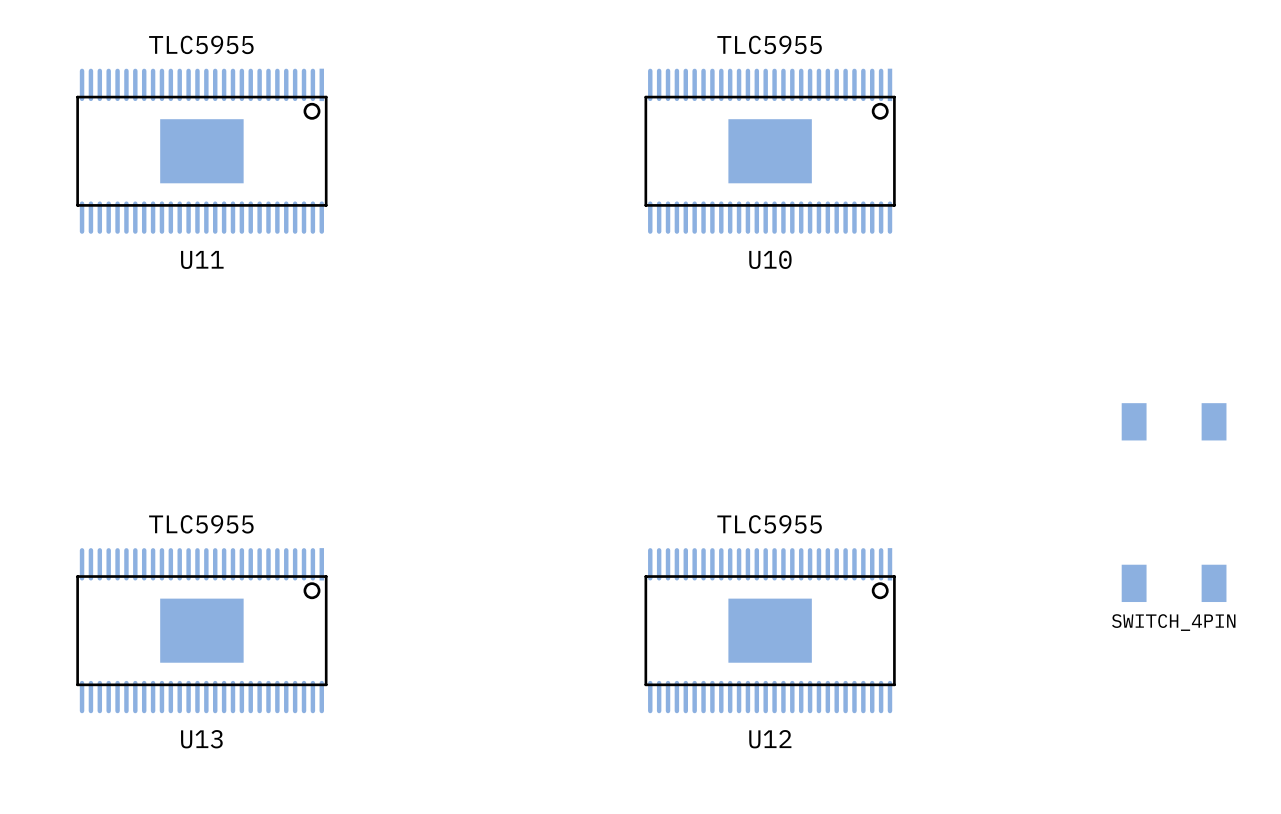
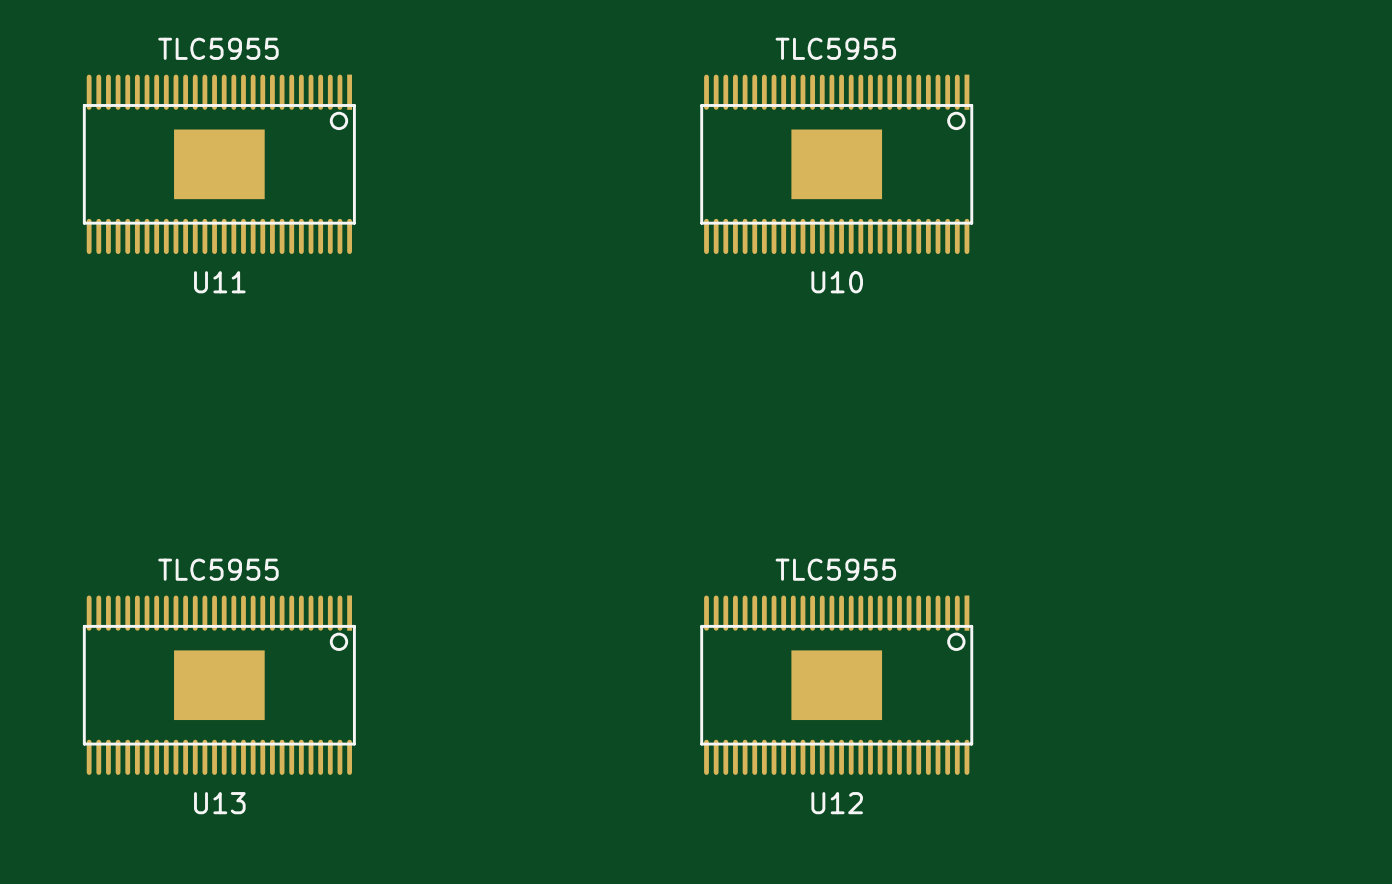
part: SWITCH_4PIN (1174, 502) -> none

